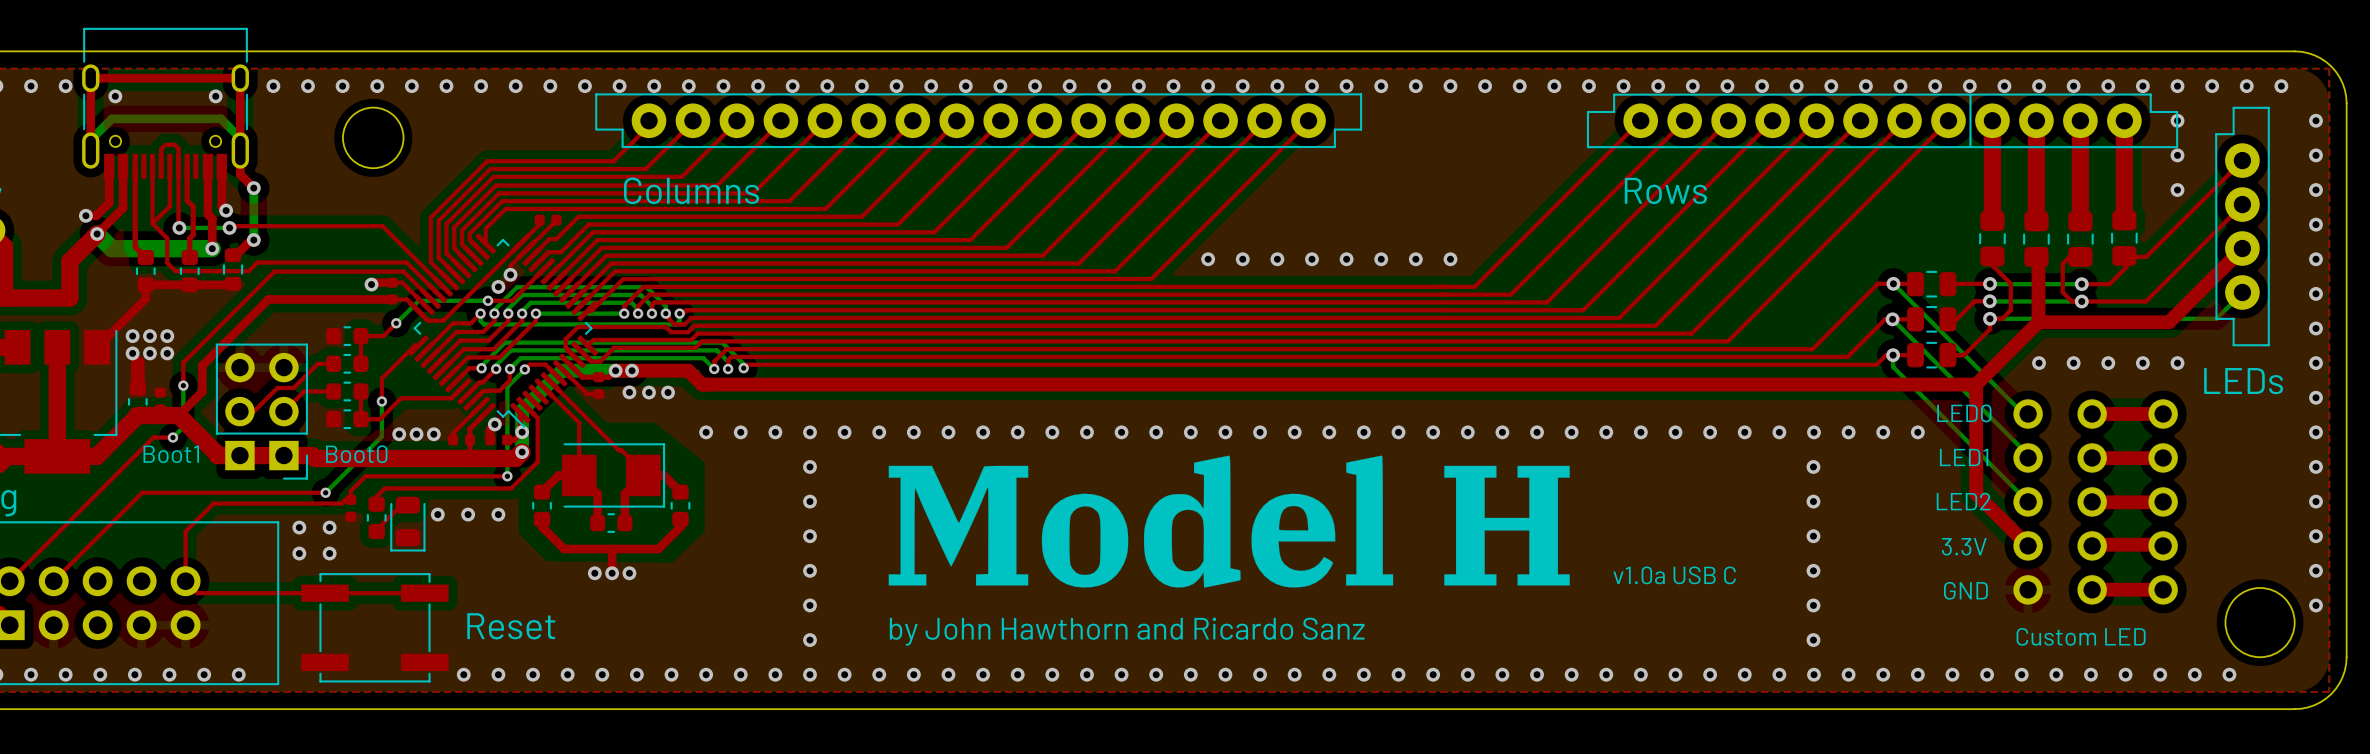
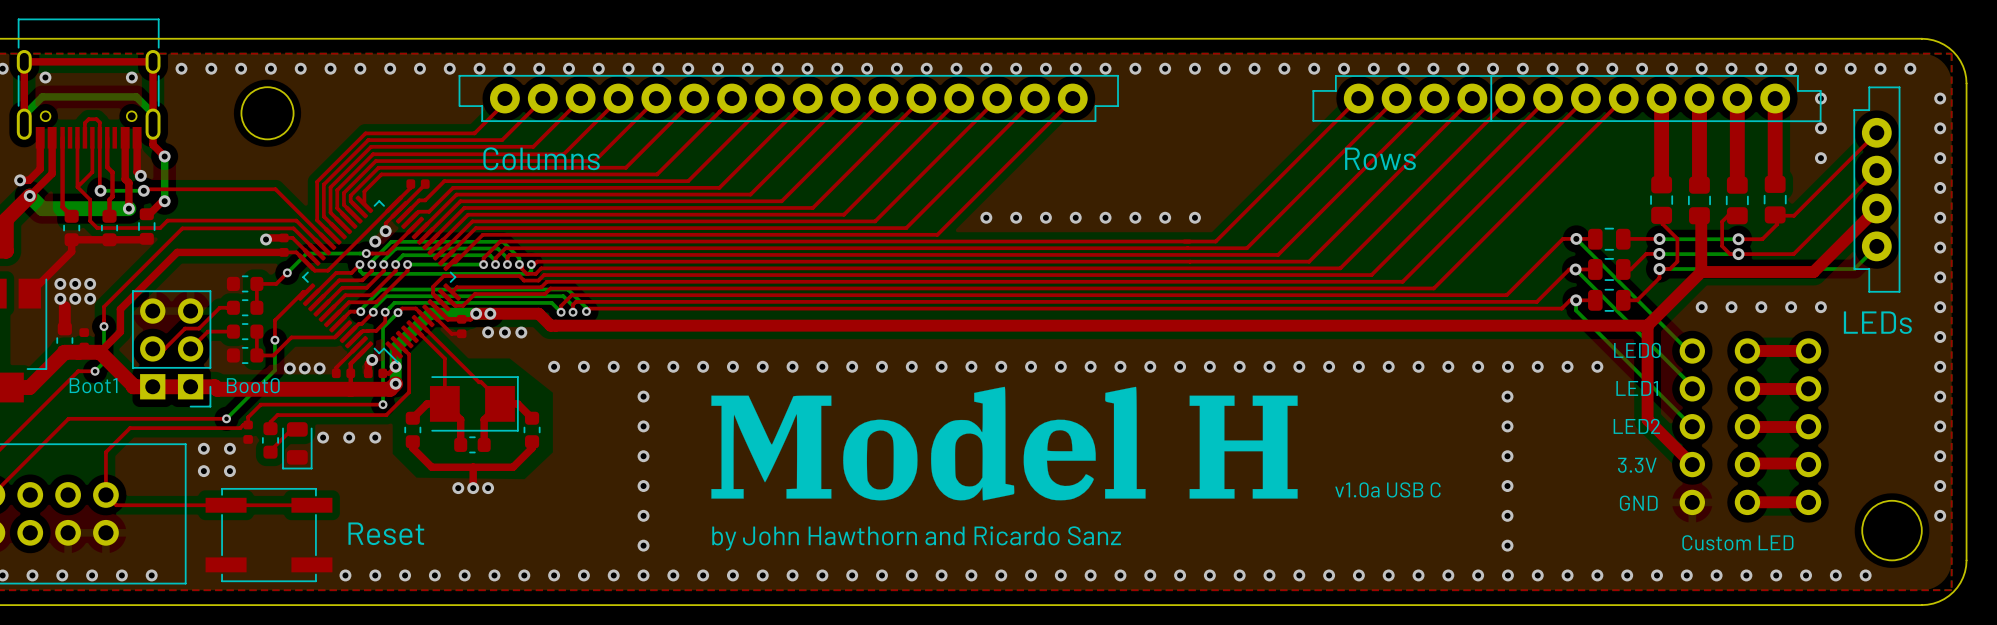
part footprint: [1586, 93, 2179, 149] -> [1312, 75, 1822, 123]

